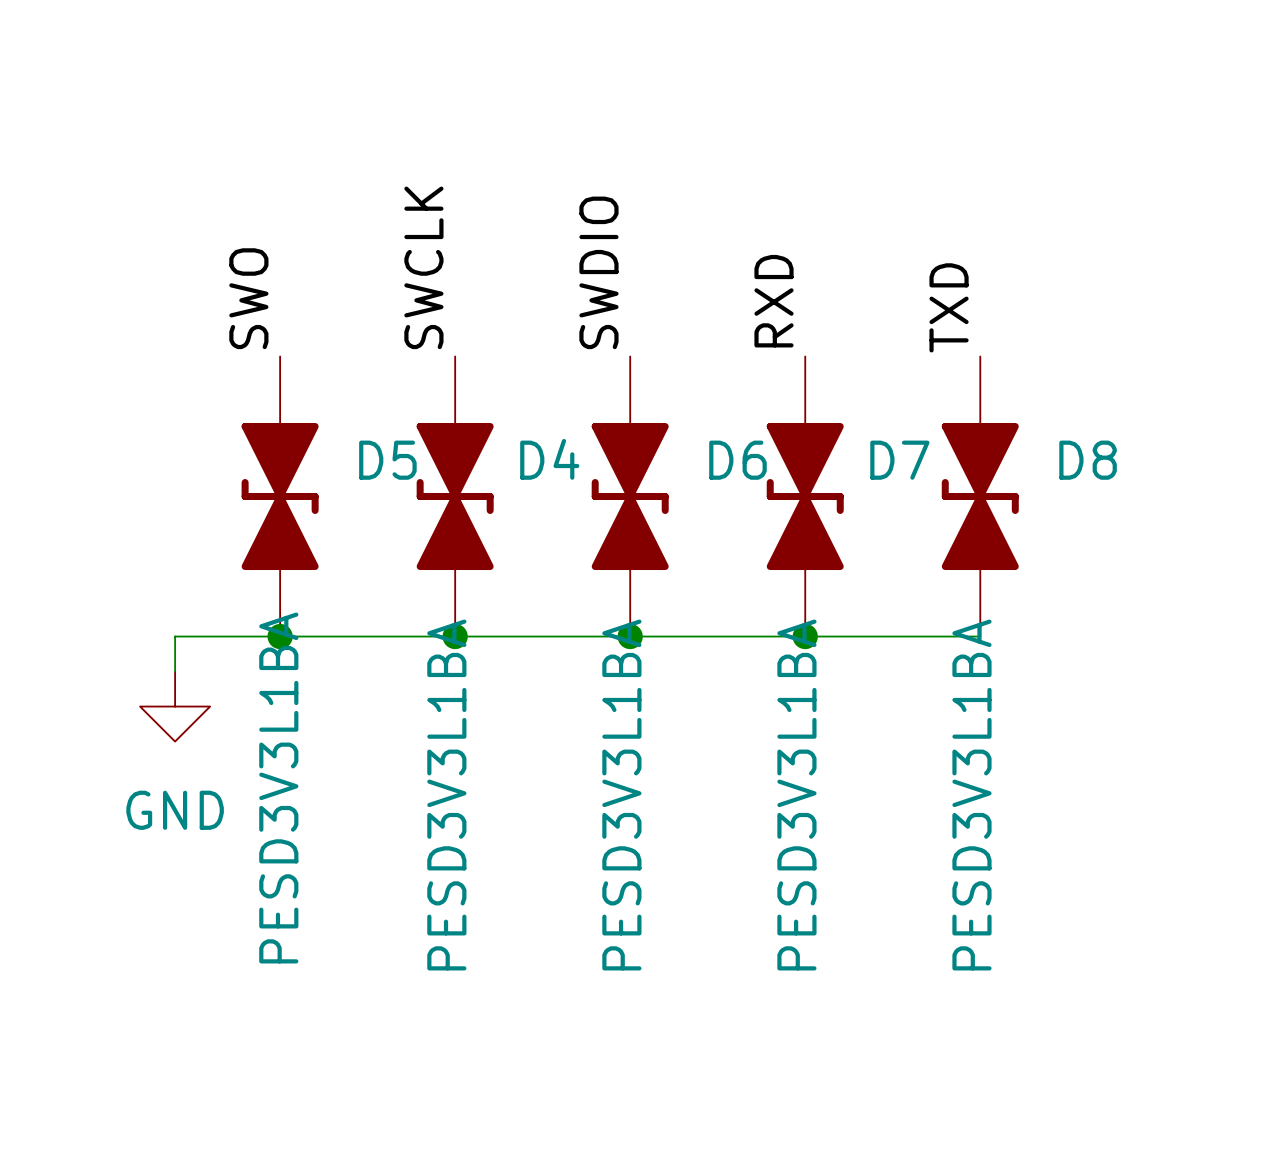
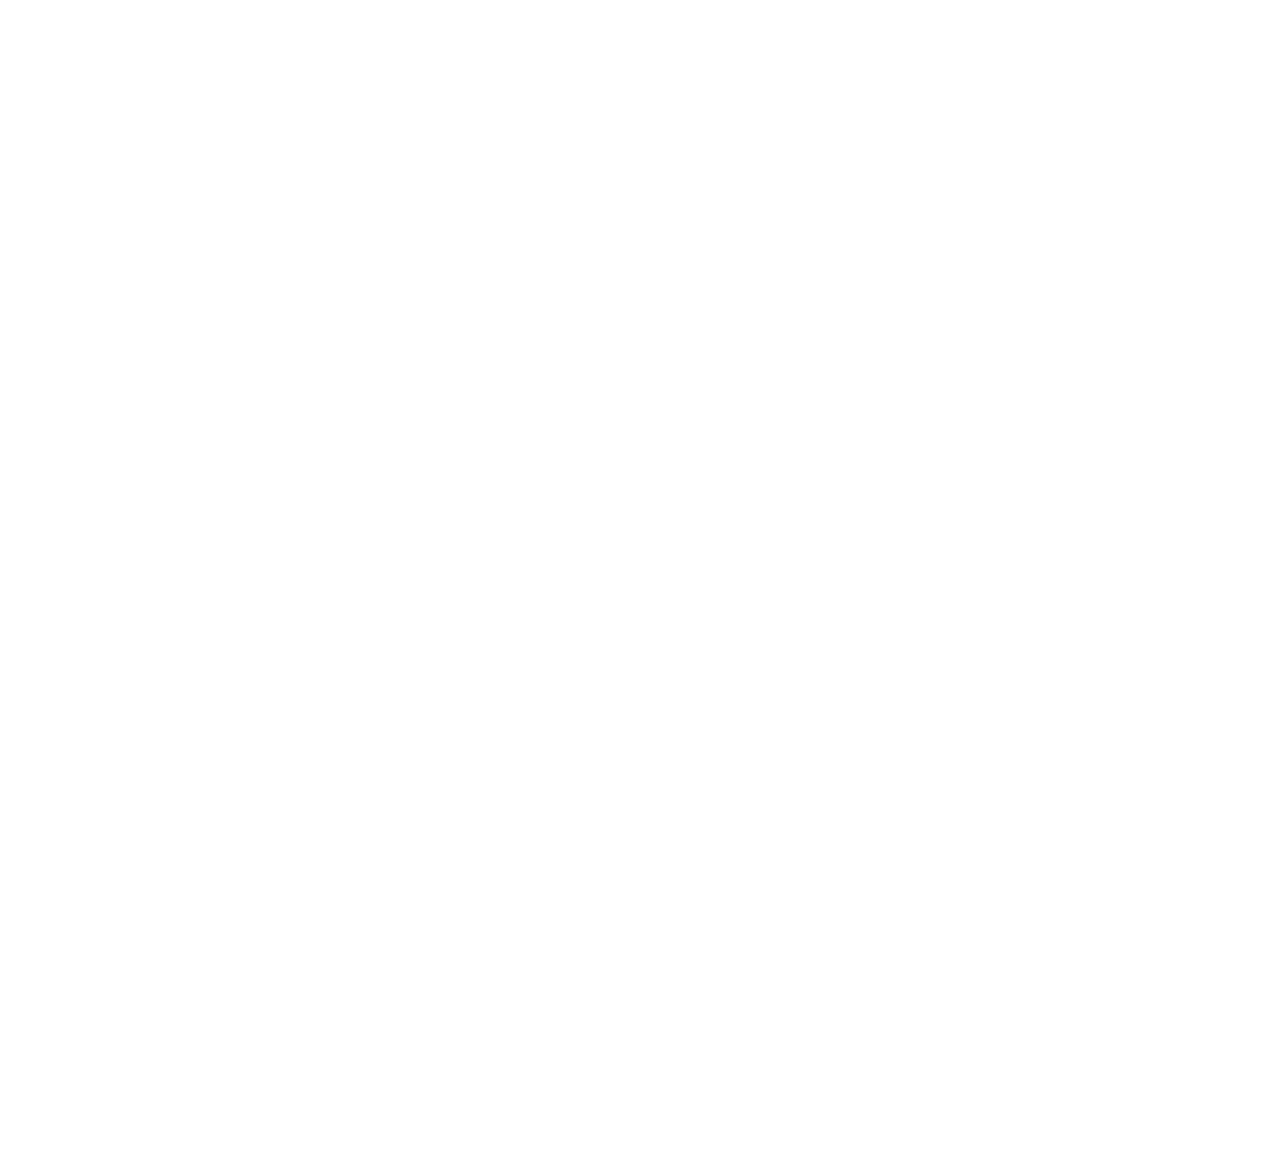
label: SWCLK (423, 267) -> none
label: SWDIO (598, 272) -> none
label: SWO (248, 298) -> none
label: RXD (774, 301) -> none
label: TXD (949, 307) -> none
D5: PESD3V3L1BA (280, 496) -> none
D4: PESD3V3L1BA (455, 496) -> none
D6: PESD3V3L1BA (630, 496) -> none
D7: PESD3V3L1BA (805, 496) -> none
D8: PESD3V3L1BA (980, 496) -> none
junction: (280, 636) -> none
junction: (455, 636) -> none
junction: (630, 636) -> none
junction: (805, 636) -> none
wire: (980, 636) (175, 636) (175, 671) -> none
power symbol: GND (175, 706) -> none

